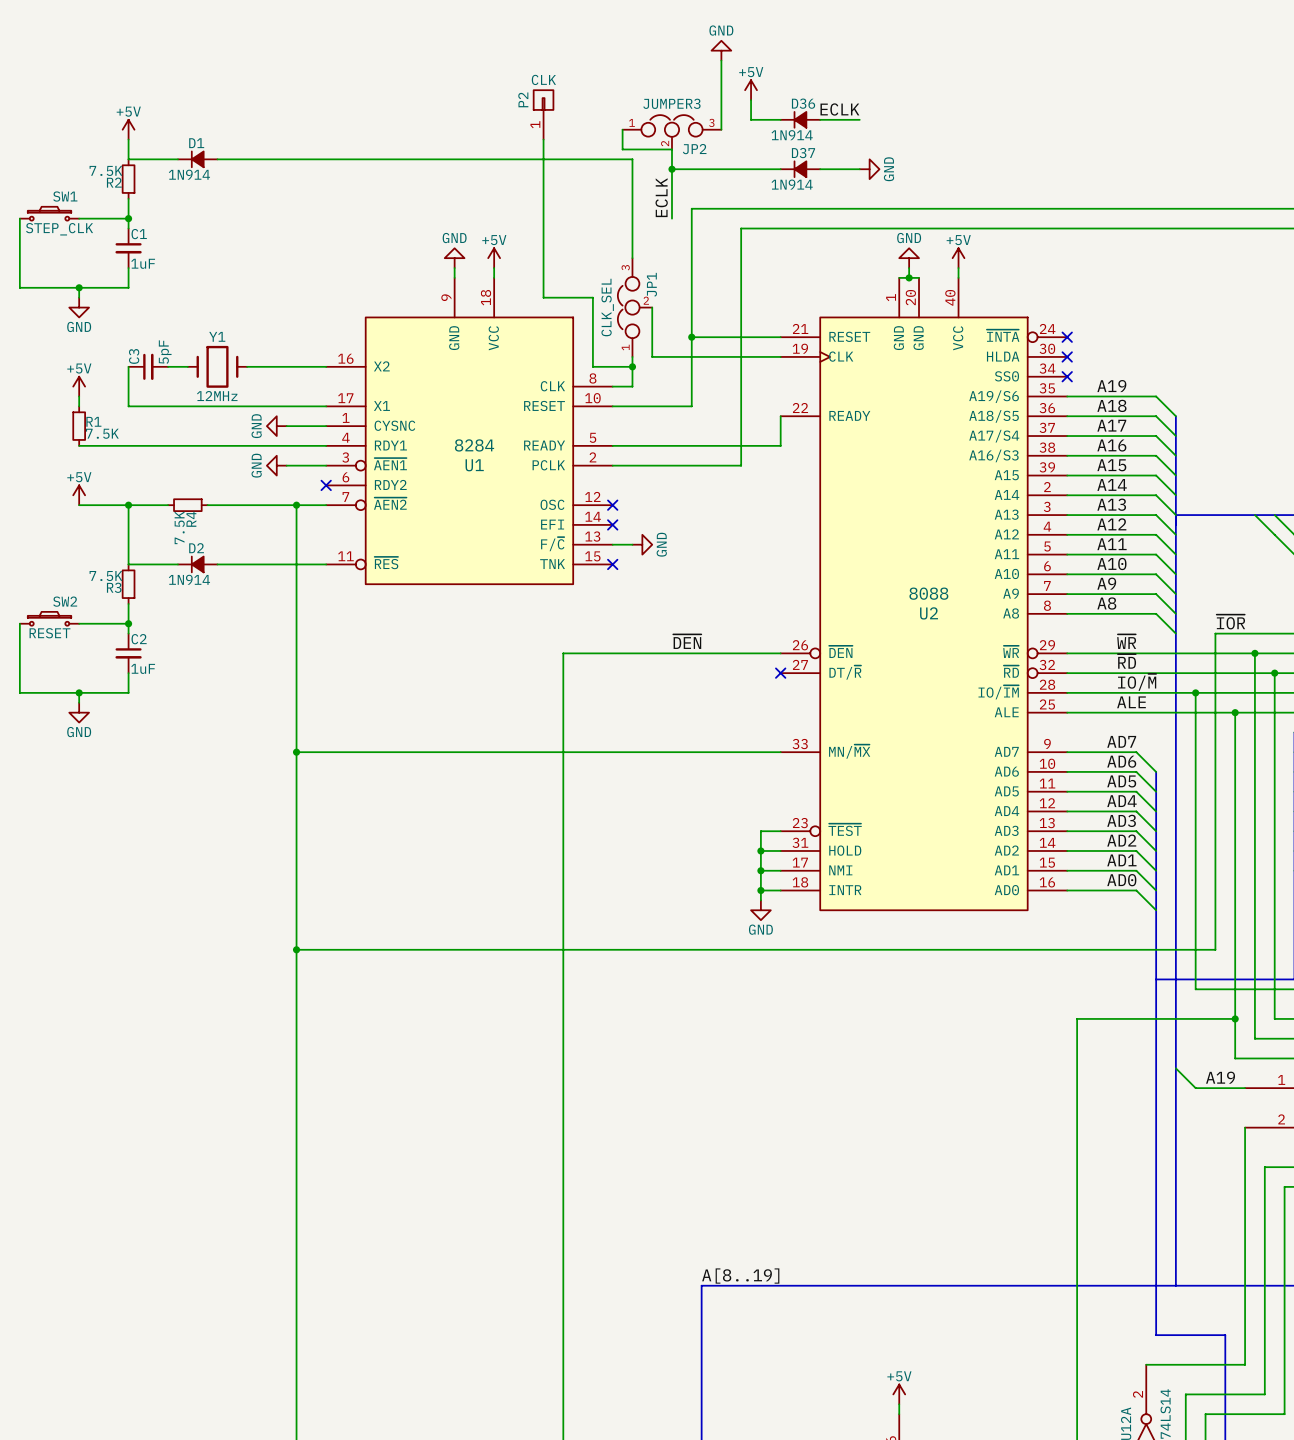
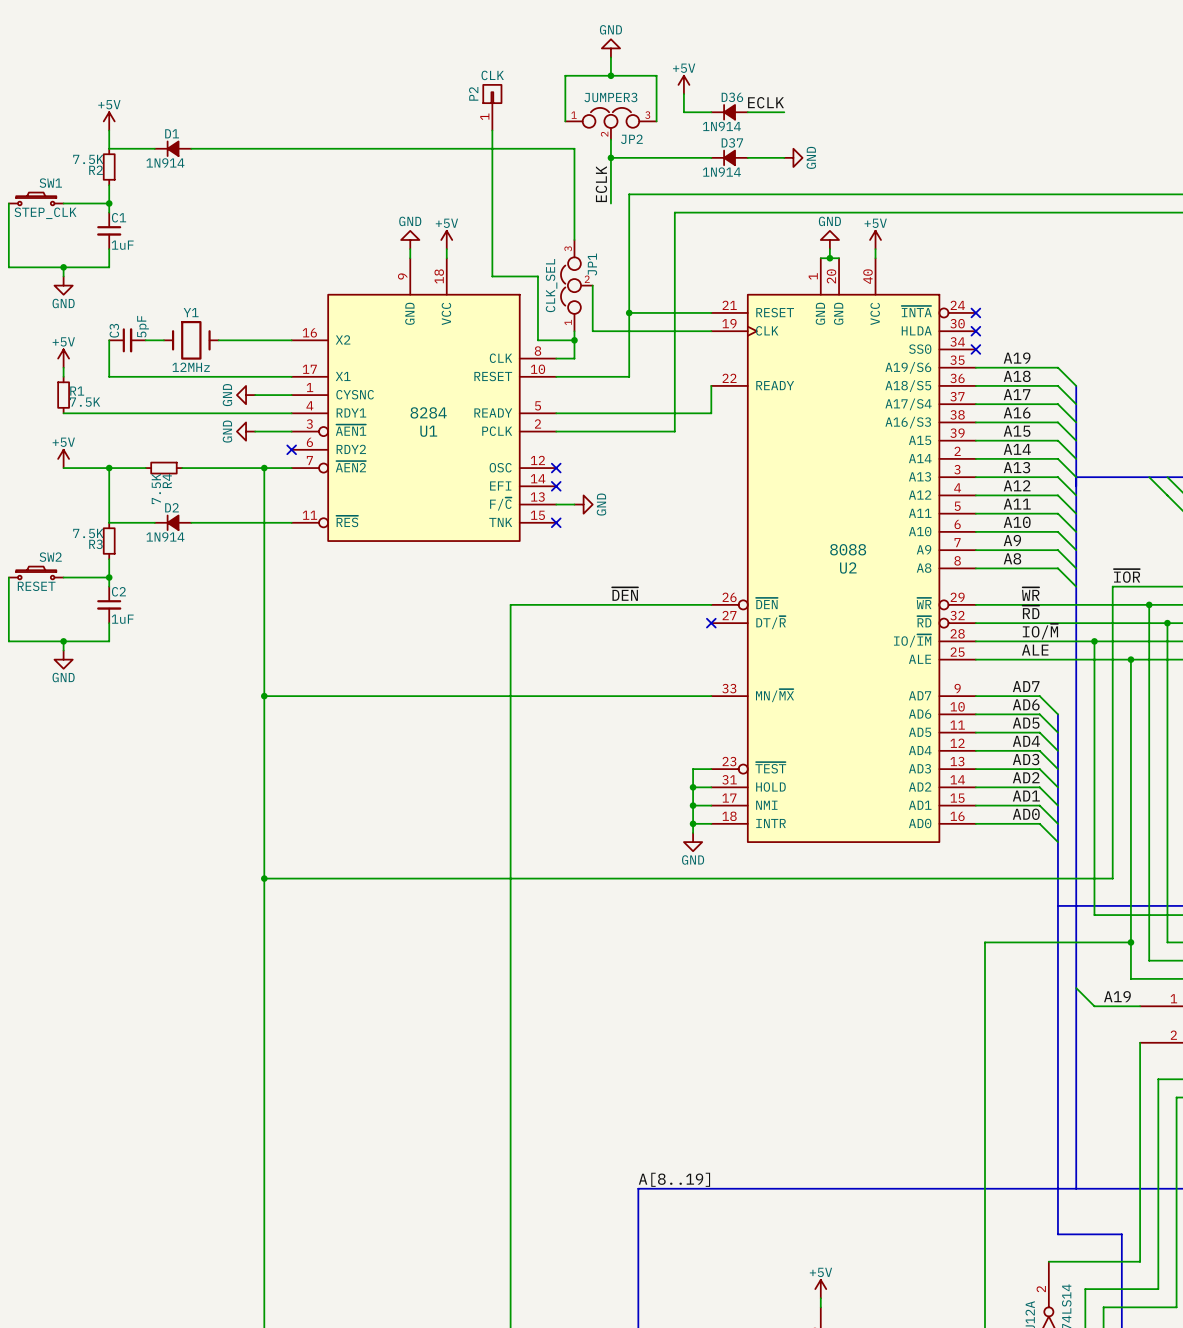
power symbol position: GND (721, 50) -> GND (610, 48)
wire: (721, 60) (721, 80) -> (610, 57) (610, 75)
junction: none -> (610, 75)
wire: (622, 129) (622, 149) (671, 149) -> (565, 121) (565, 75) (656, 75)

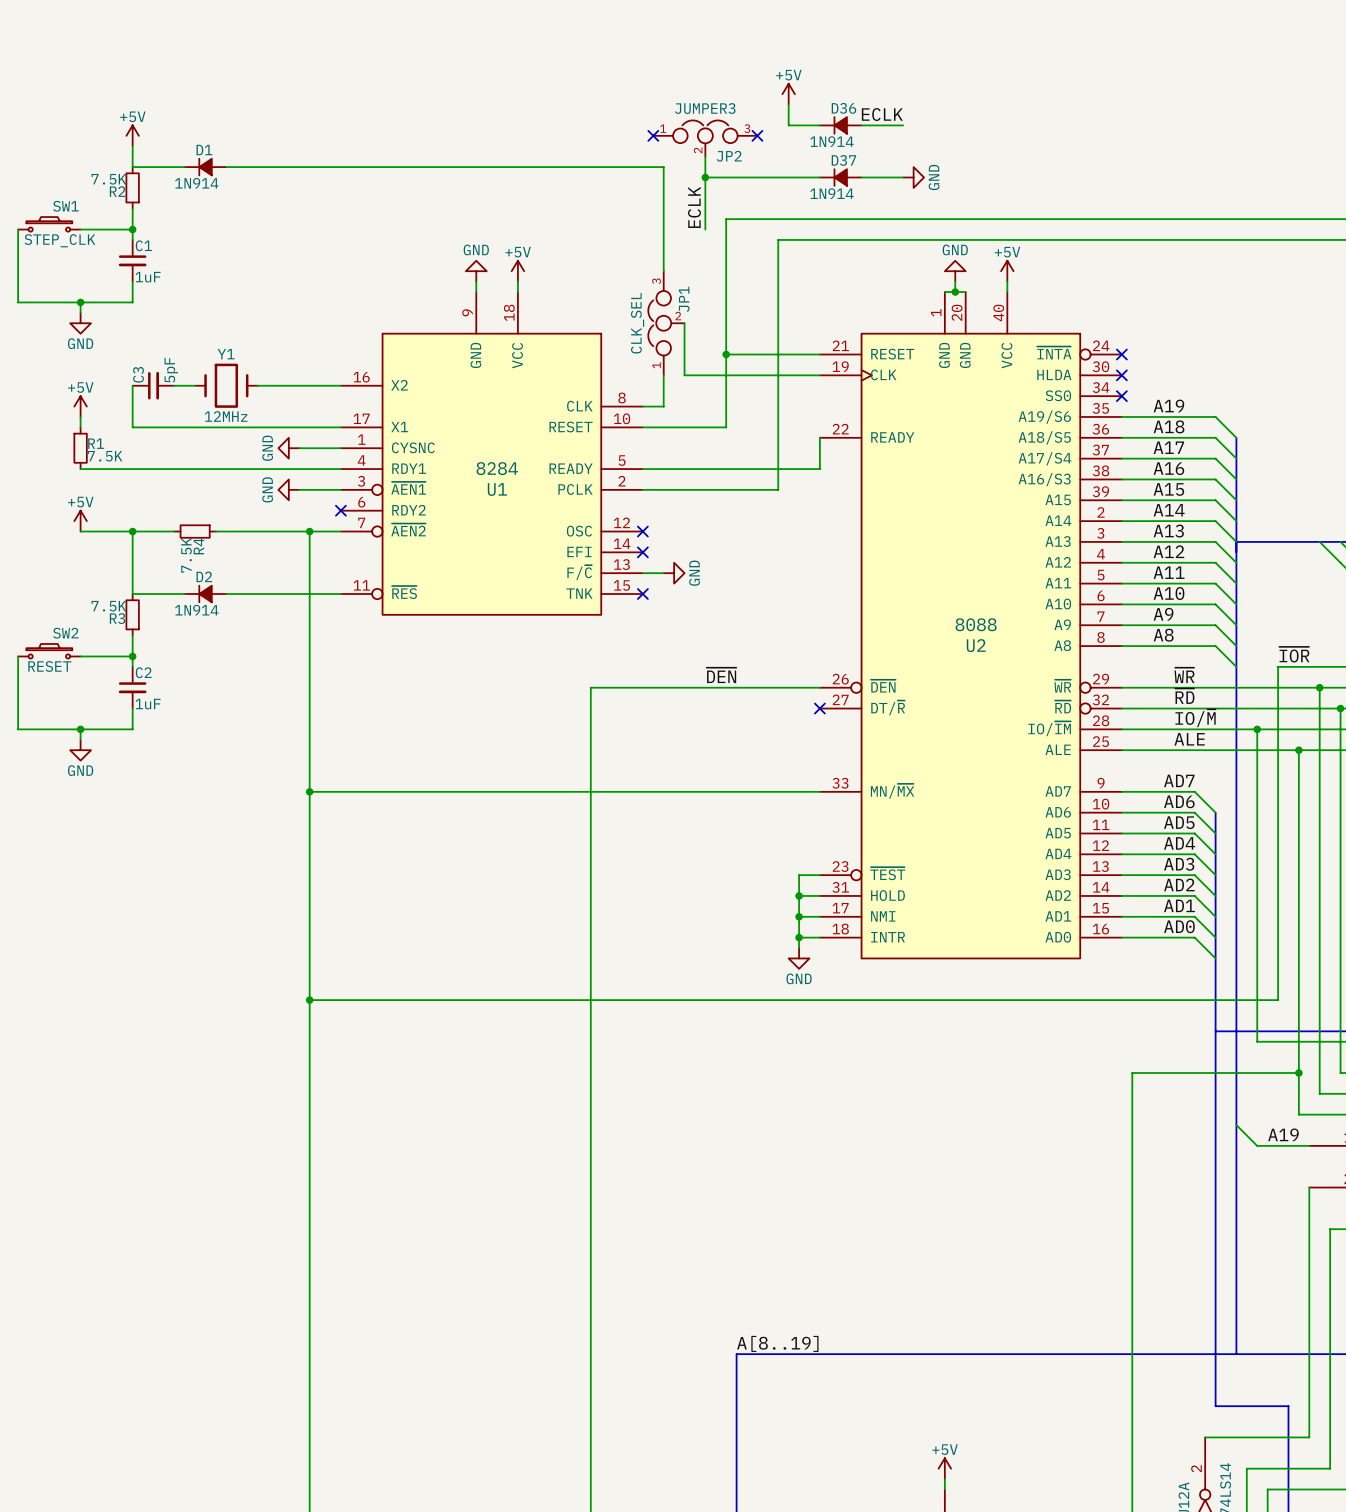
power symbol: GND (610, 48) -> none
wire: (610, 57) (610, 75) -> none
junction: (610, 75) -> none
P2: CLK (492, 107) -> none
wire: (565, 121) (565, 75) (656, 75) (656, 121) -> none
no-connect mark: none -> (653, 135)
no-connect mark: none -> (757, 135)
wire: (492, 130) (492, 276) (537, 276) (537, 340) (574, 340) -> none
junction: (574, 340) -> none

